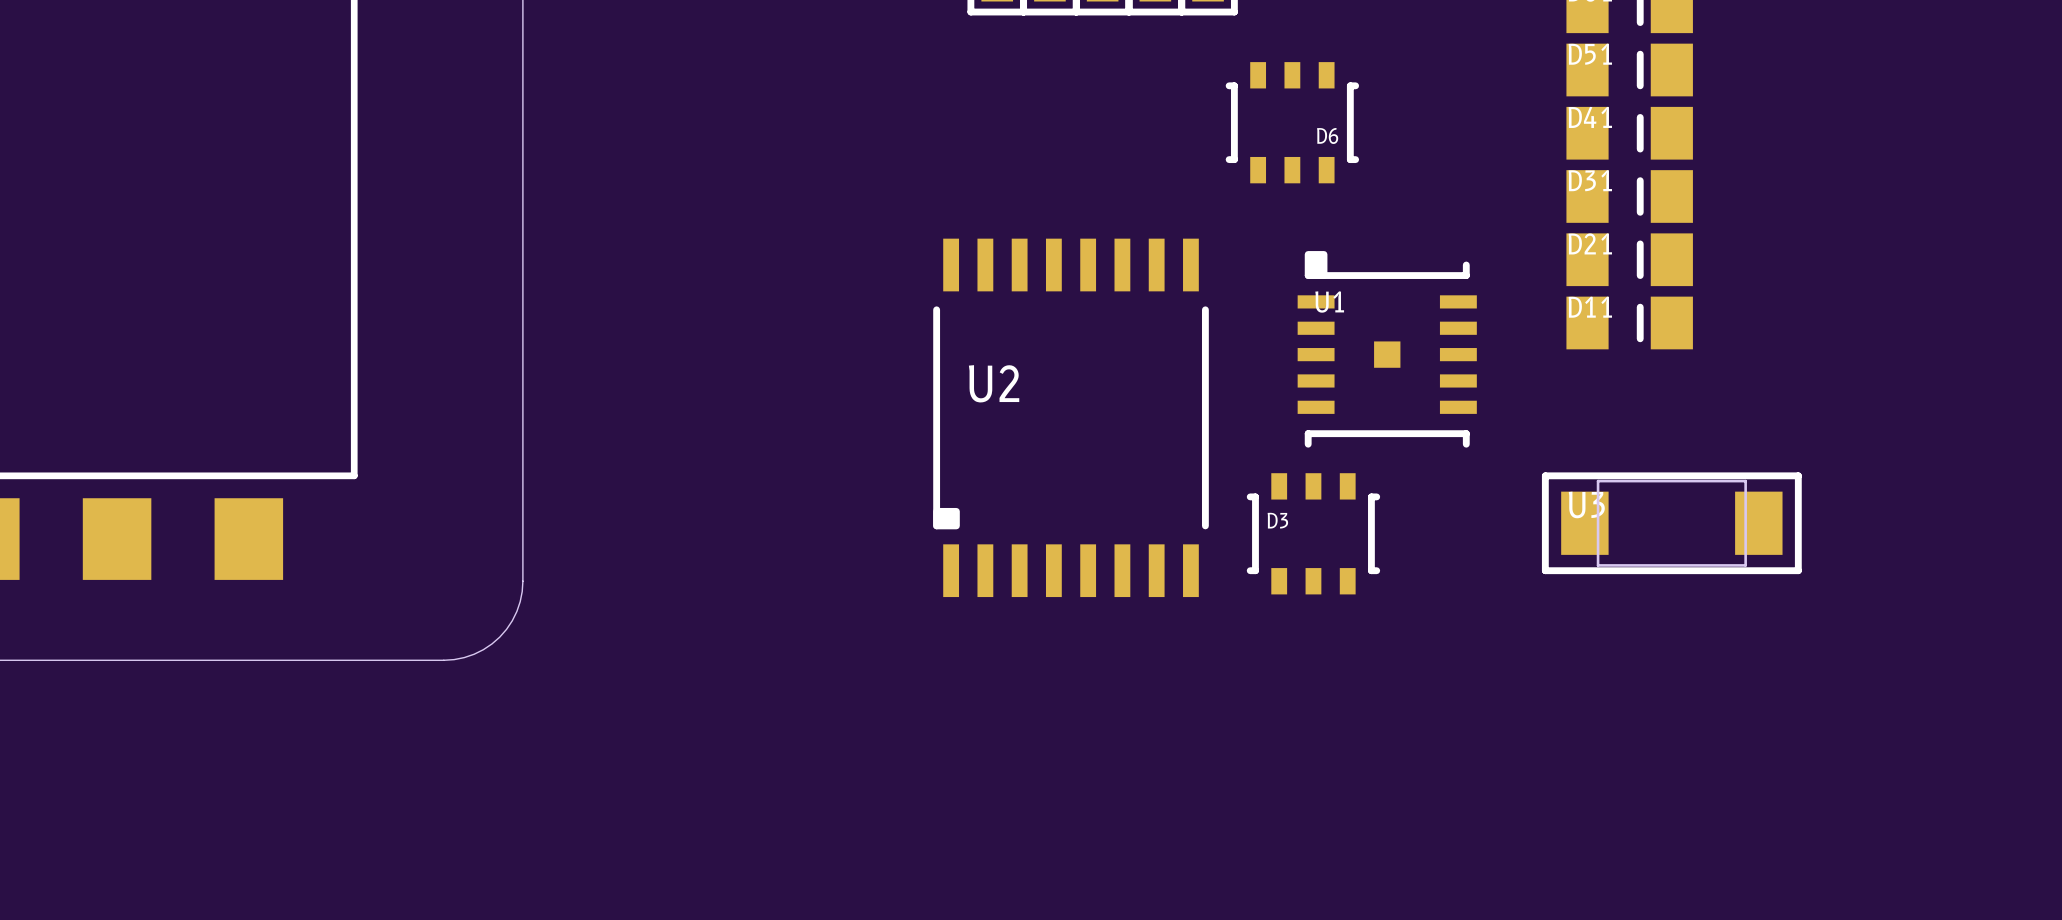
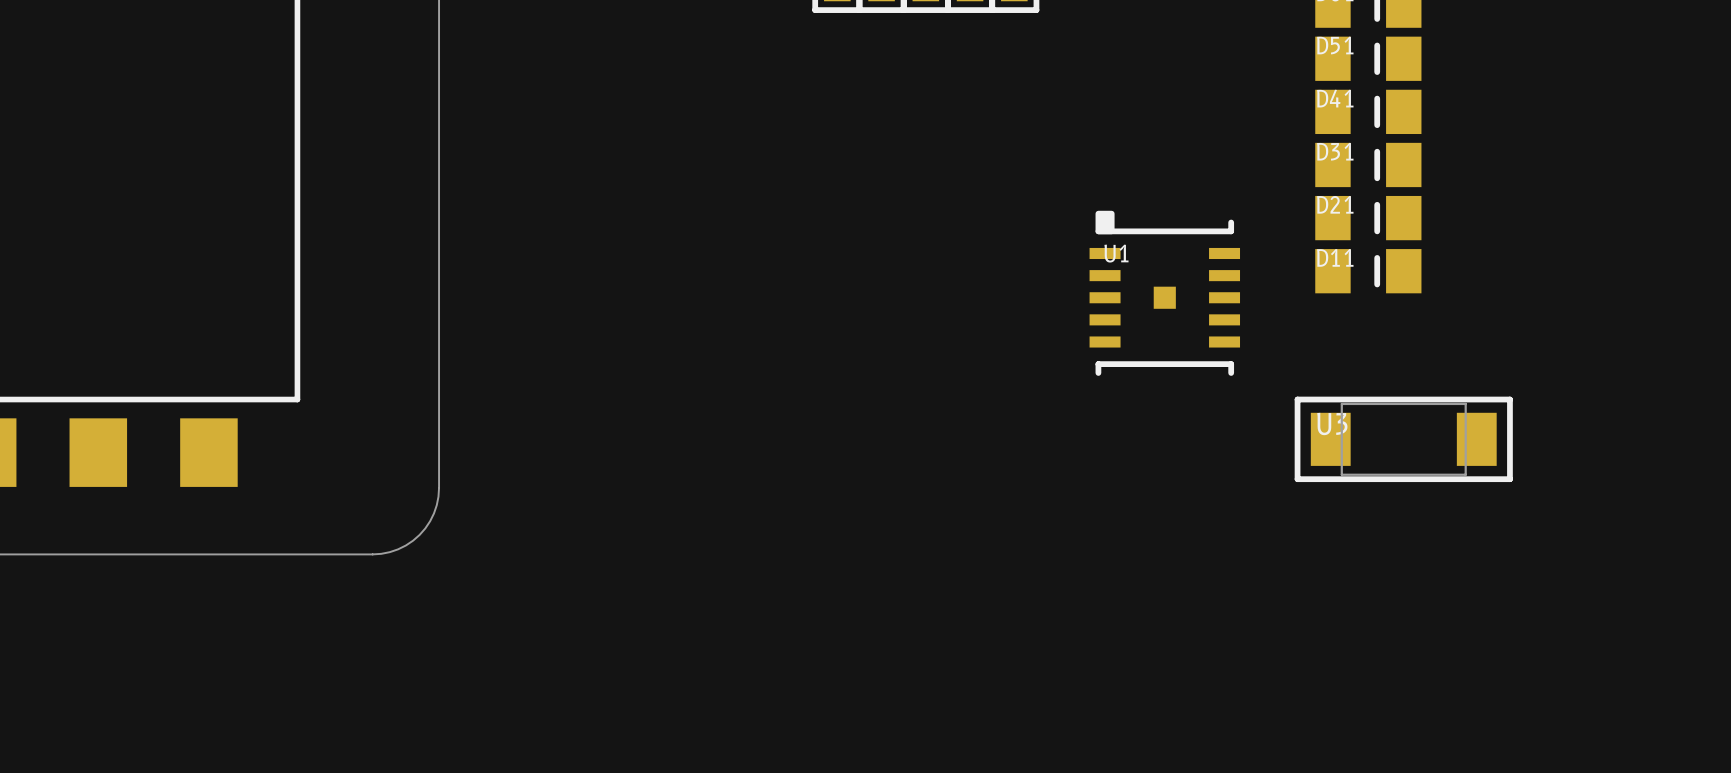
D6: (1292, 122) -> none
U2: (1071, 417) -> none
D3: (1313, 533) -> none

